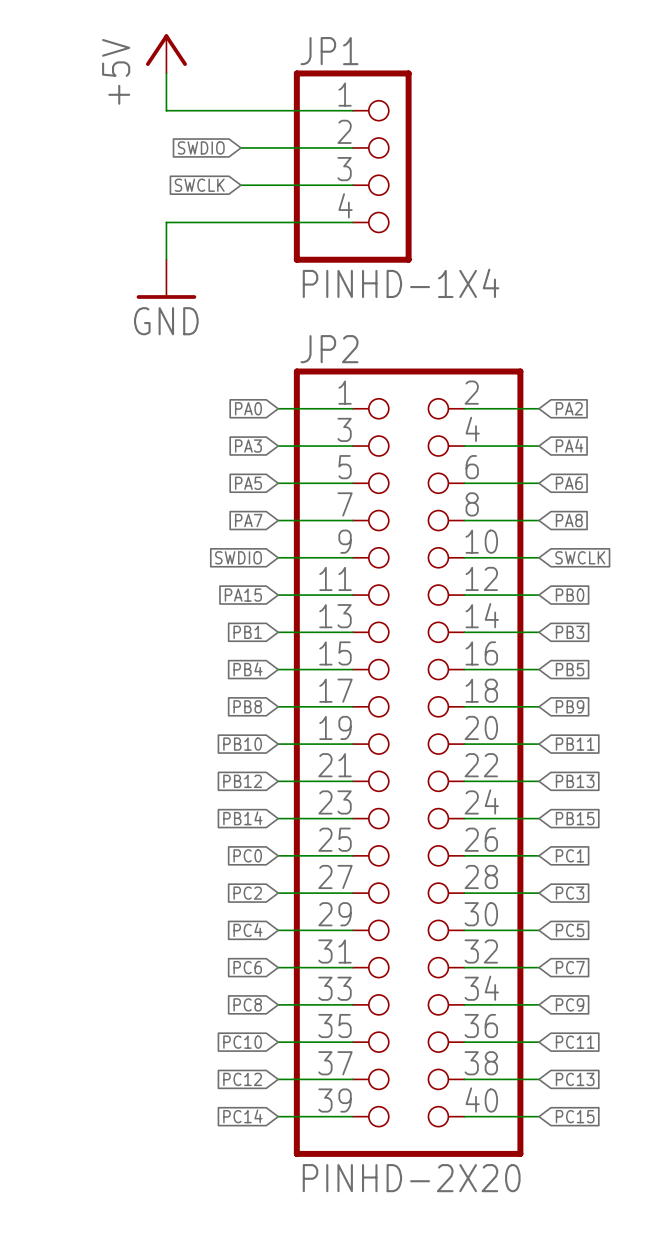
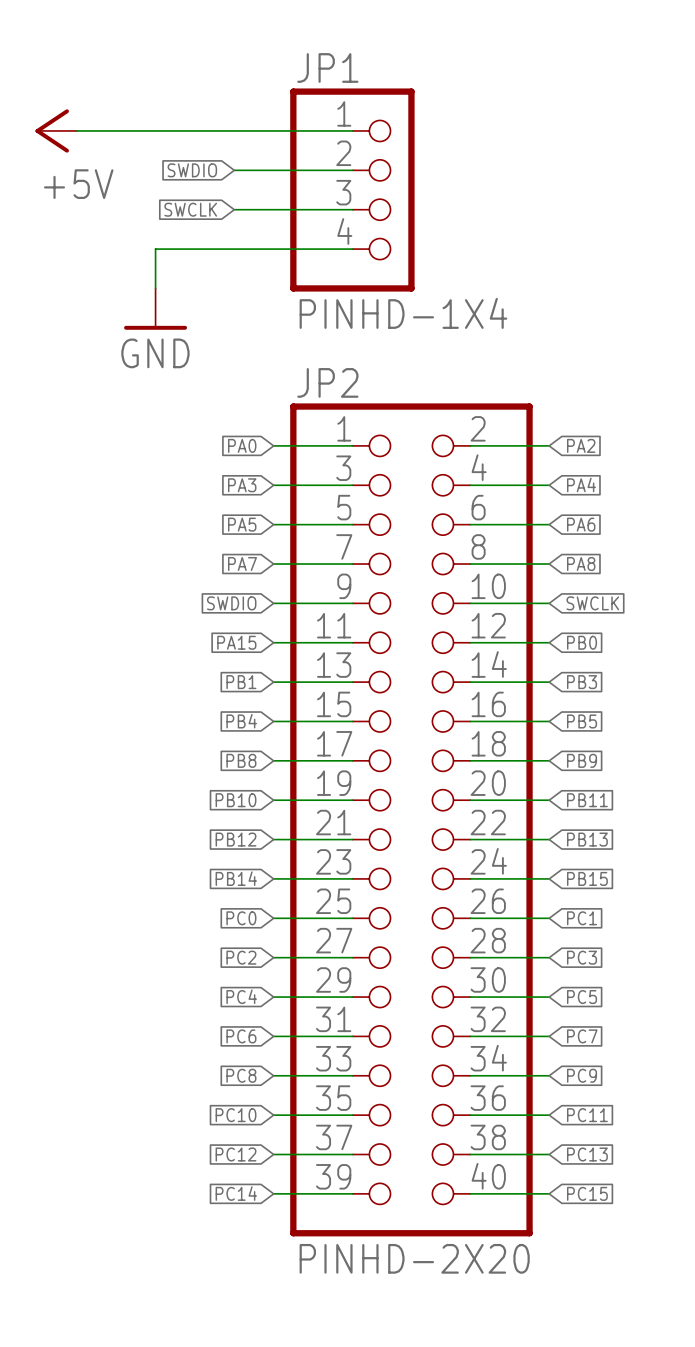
power symbol rotation: 0° (166, 50) -> 90° counterclockwise (52, 130)
power symbol position: +5V (166, 53) -> +5V (56, 130)
wire: (166, 73) (166, 110) -> (76, 130) (155, 130)

